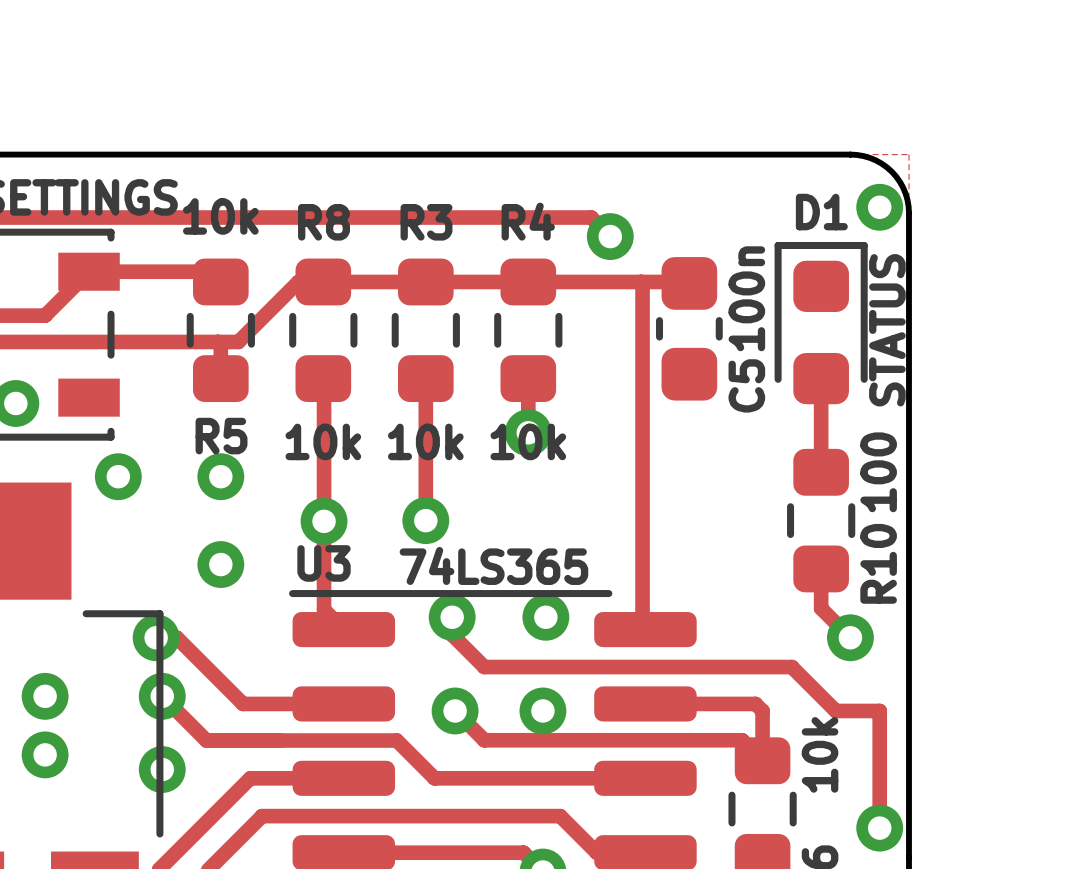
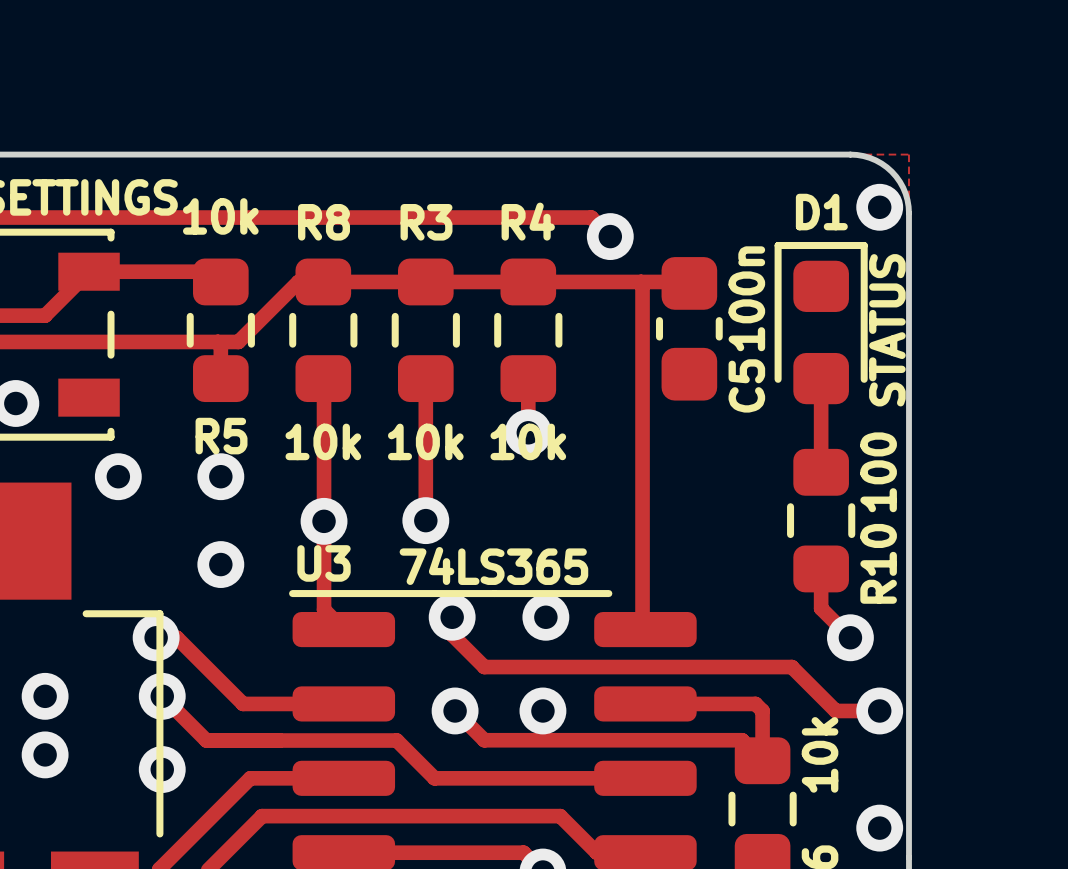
track: (879, 710) (879, 828) -> none
via: none -> (879, 710)

